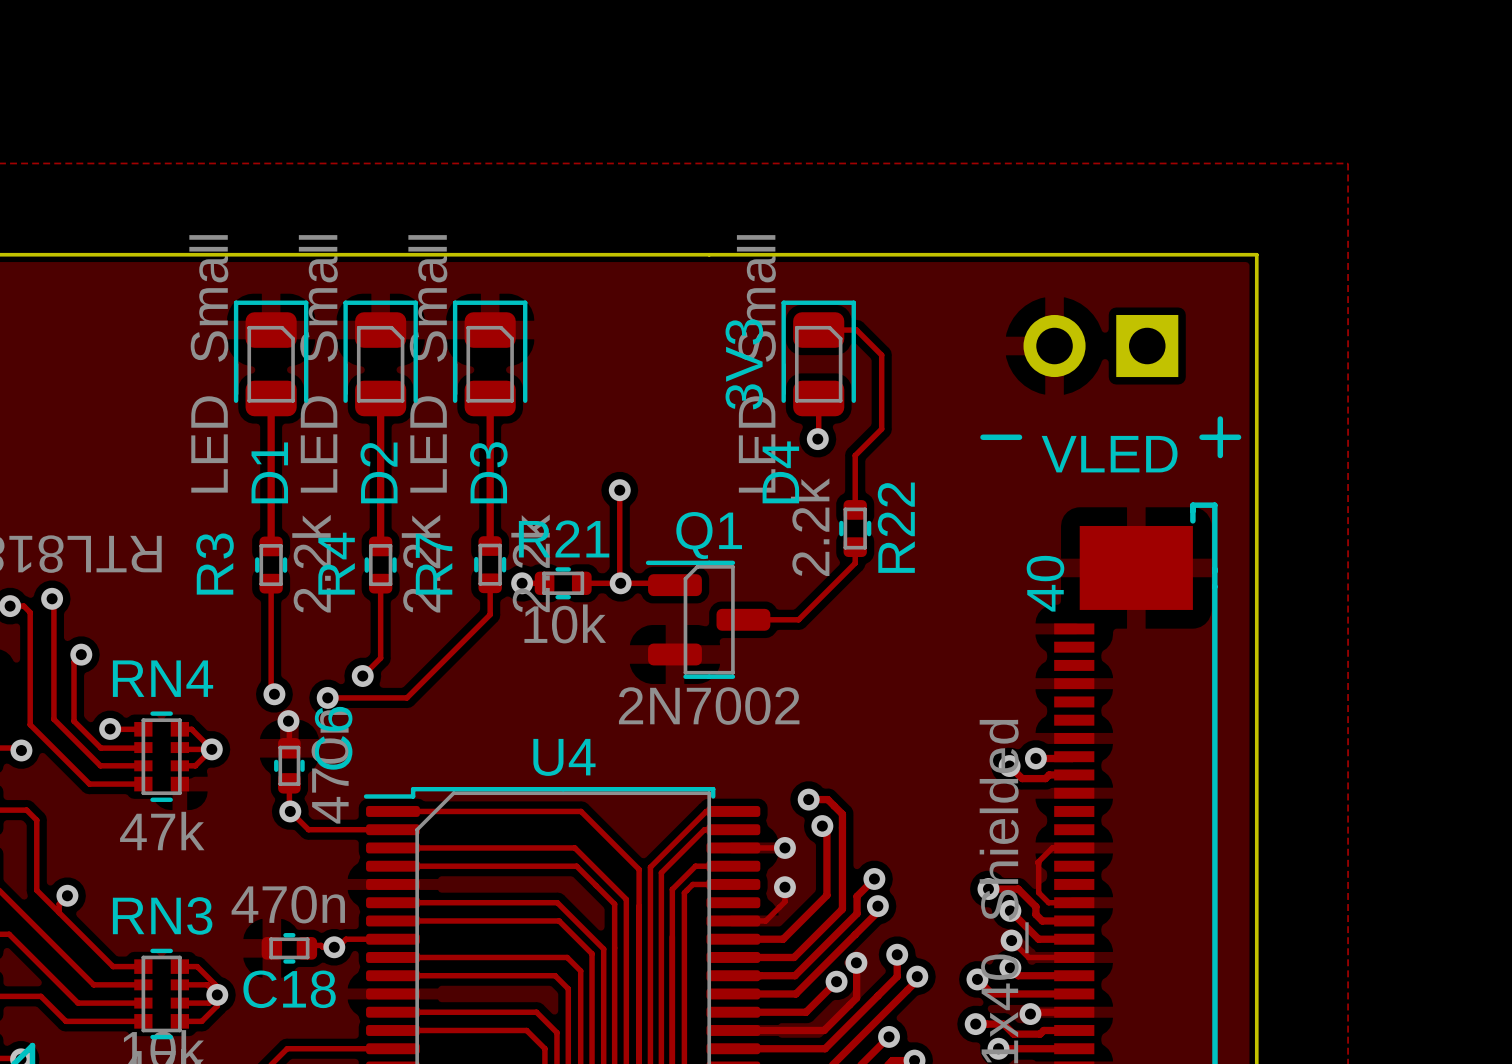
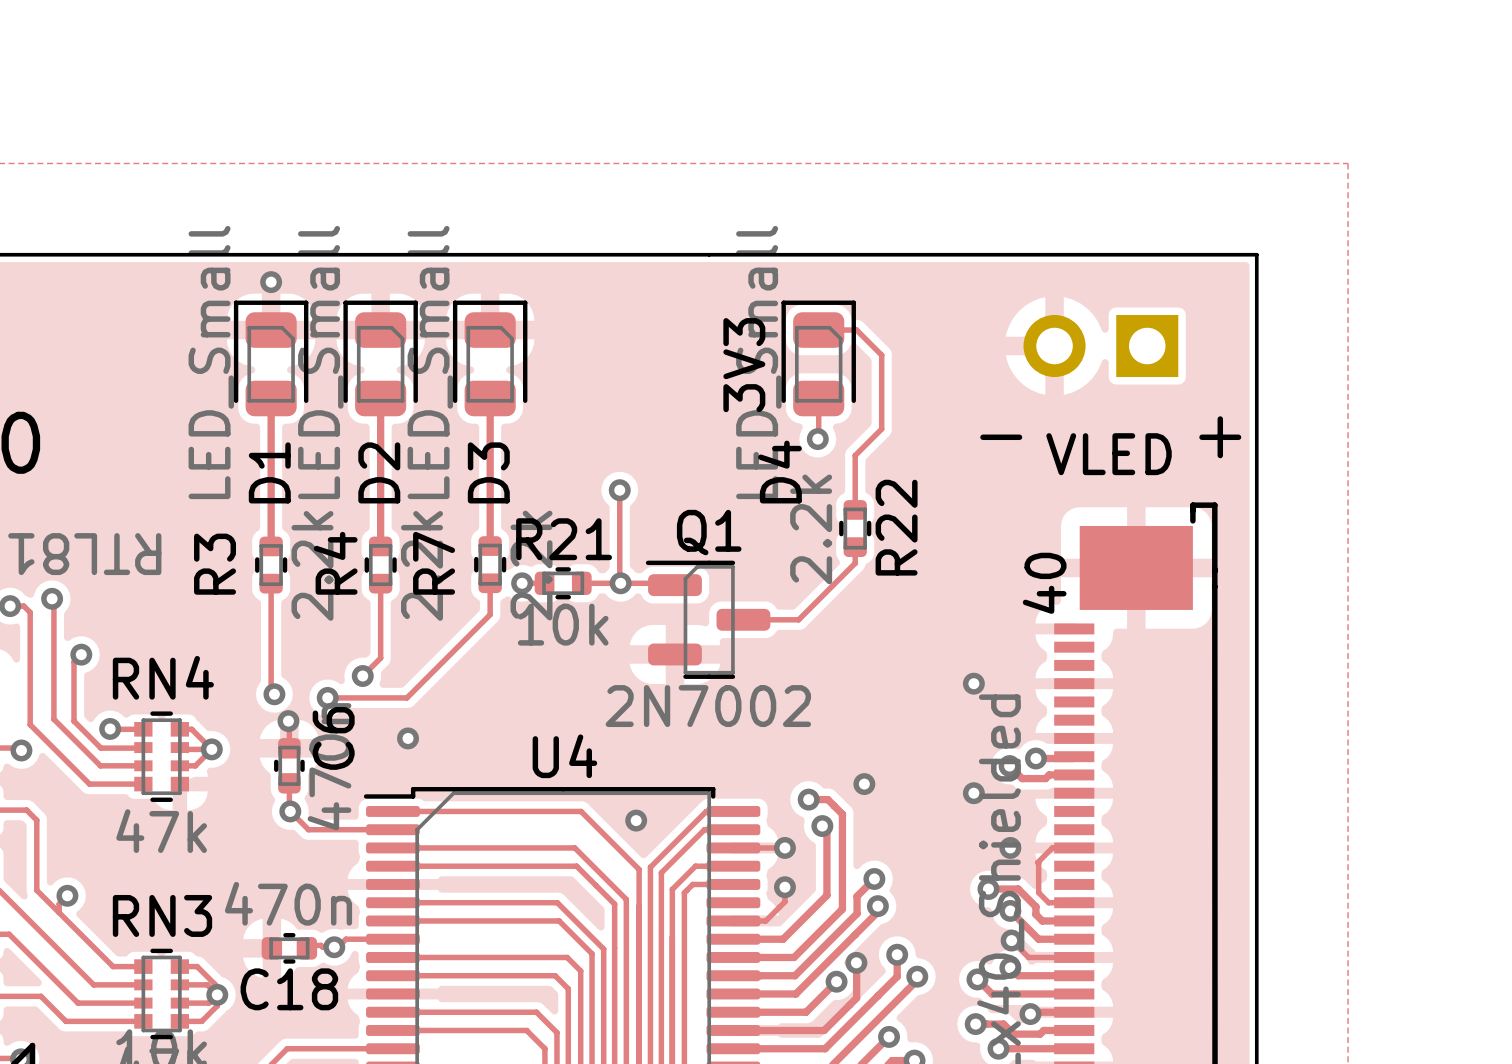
via: none -> (271, 282)
via: none -> (973, 683)
via: none -> (408, 738)
via: none -> (864, 784)
via: none -> (973, 793)
via: none -> (636, 820)
via: none -> (1010, 847)

